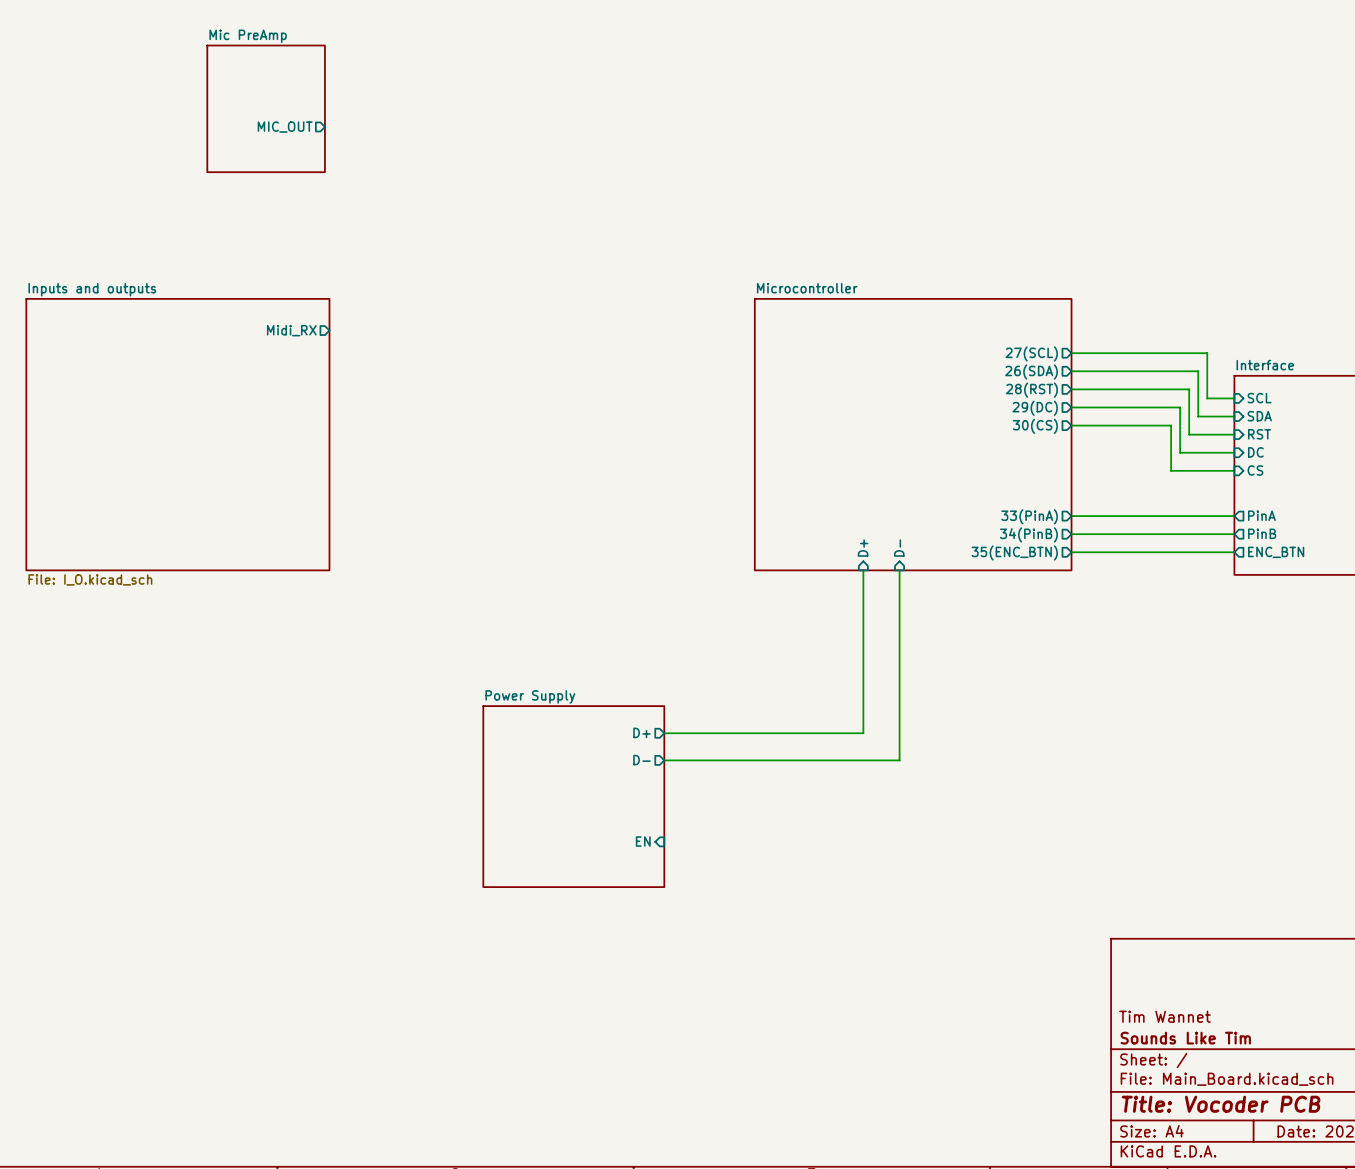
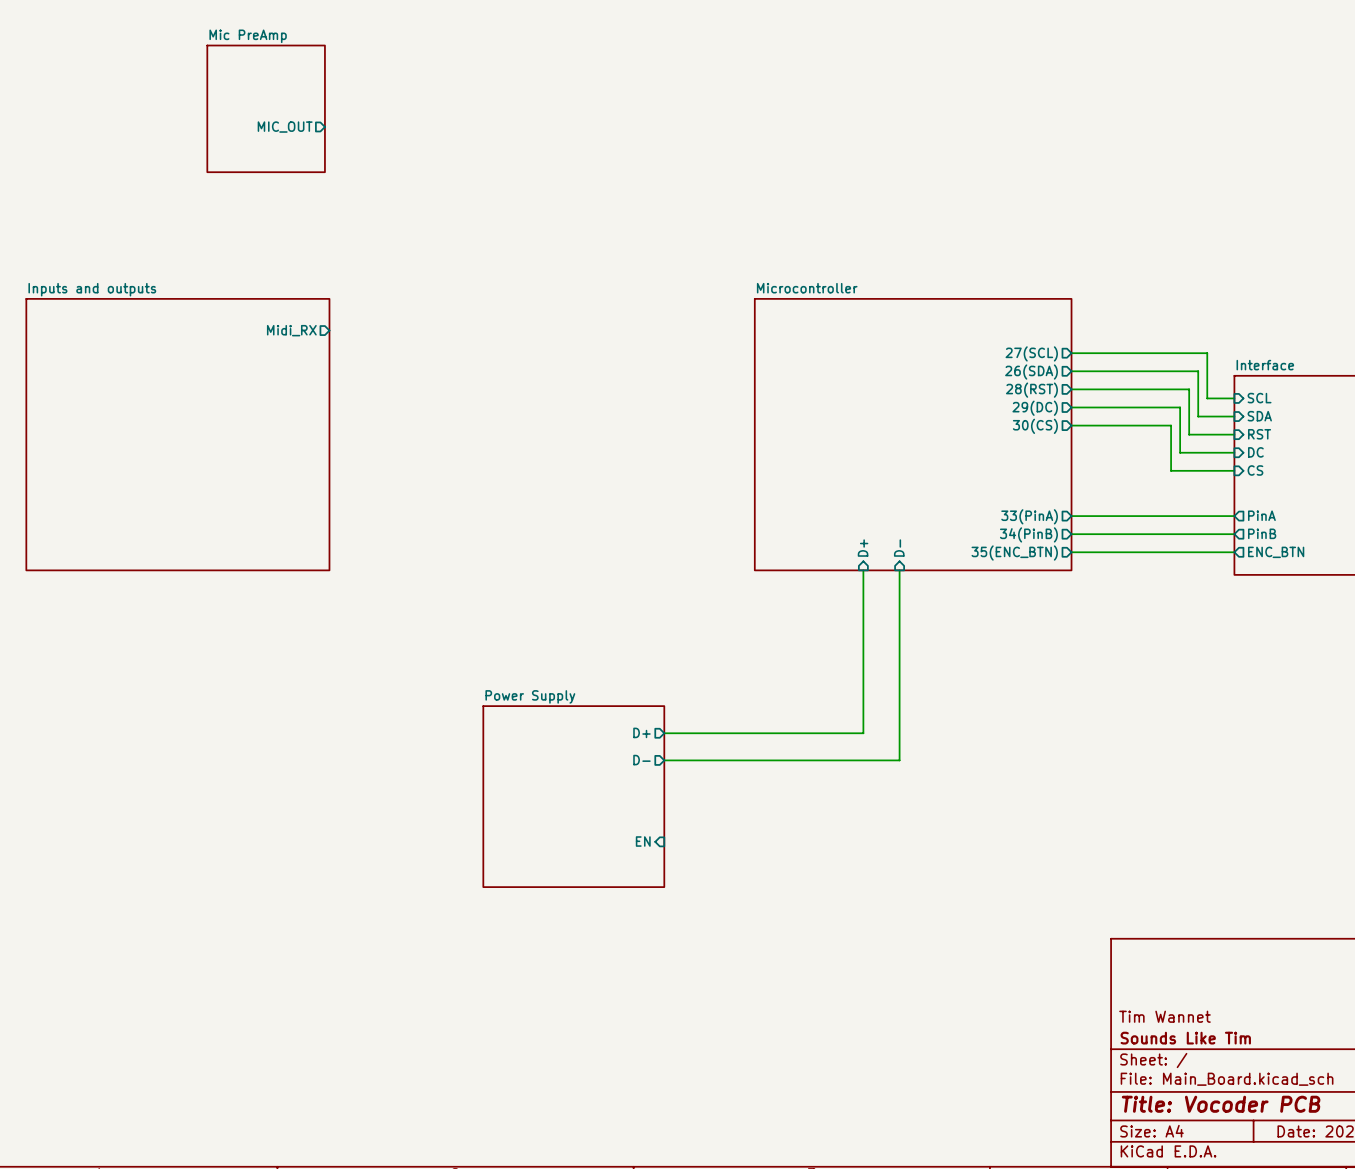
sheet Inputs and outputs value: File: I_O.kicad_sch (90, 579) -> none

